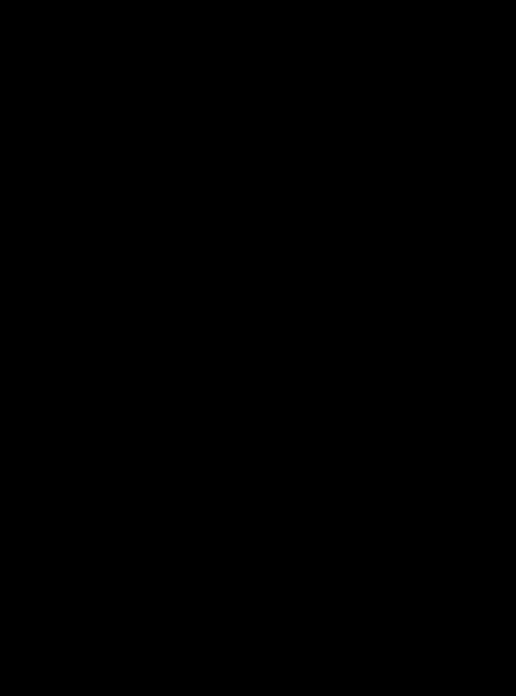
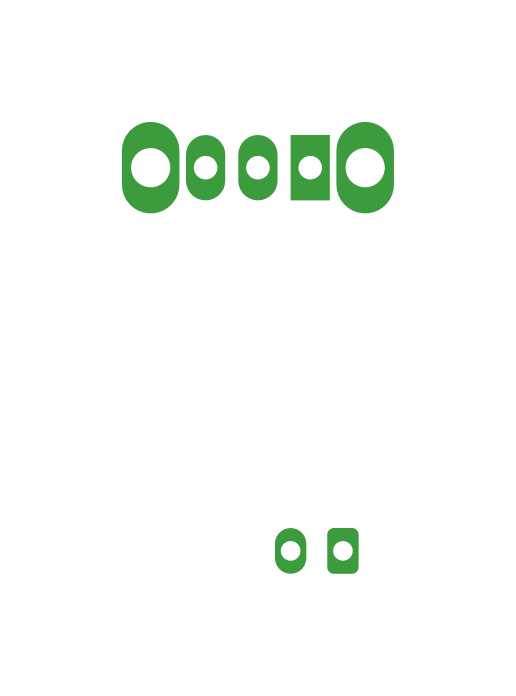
part: none -> (257, 167)
part: none -> (316, 550)

